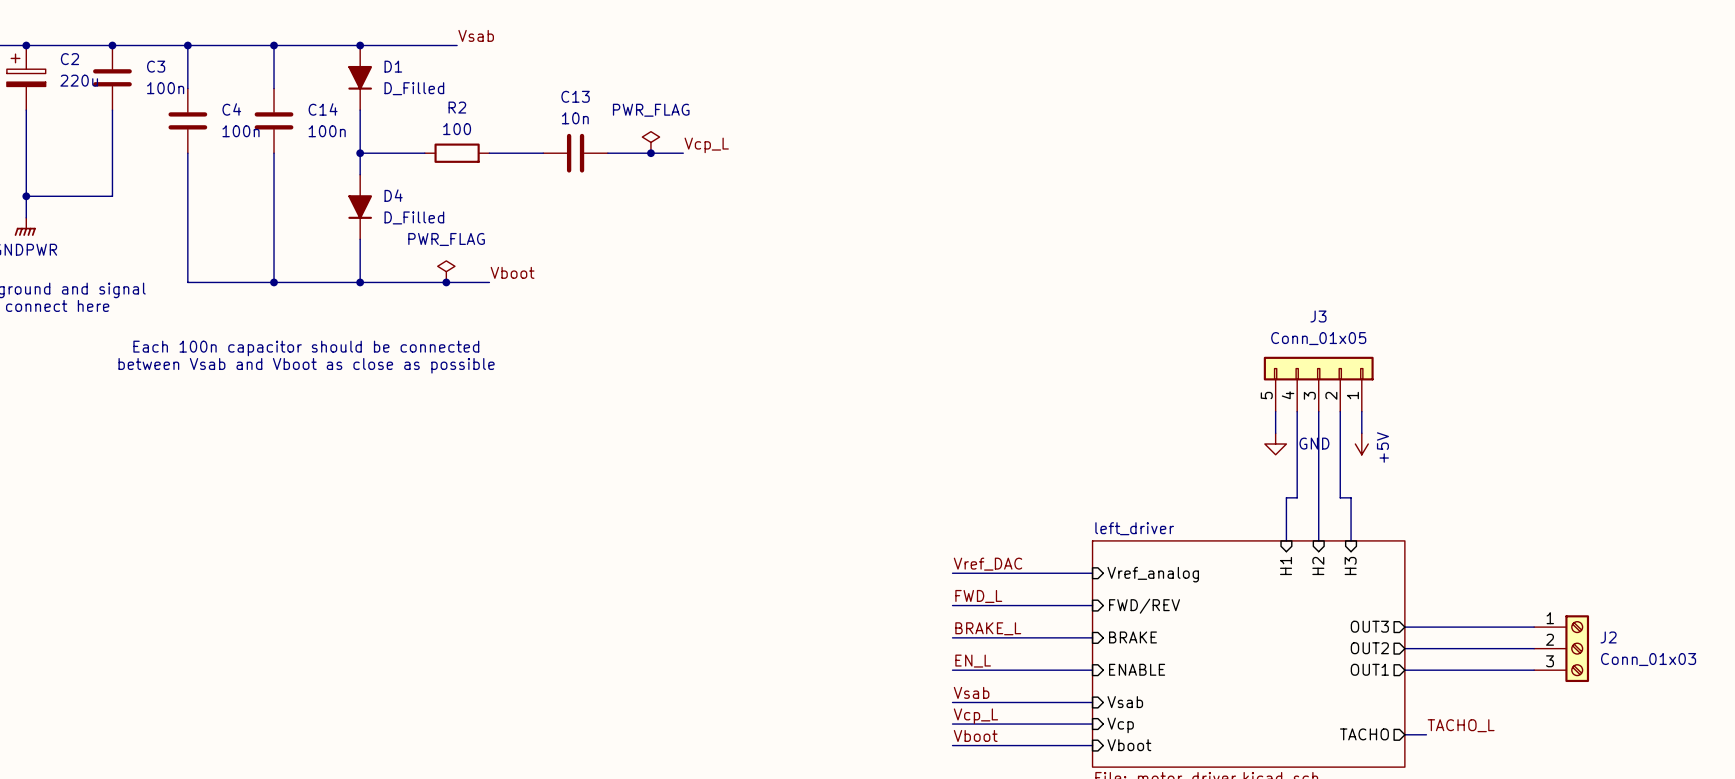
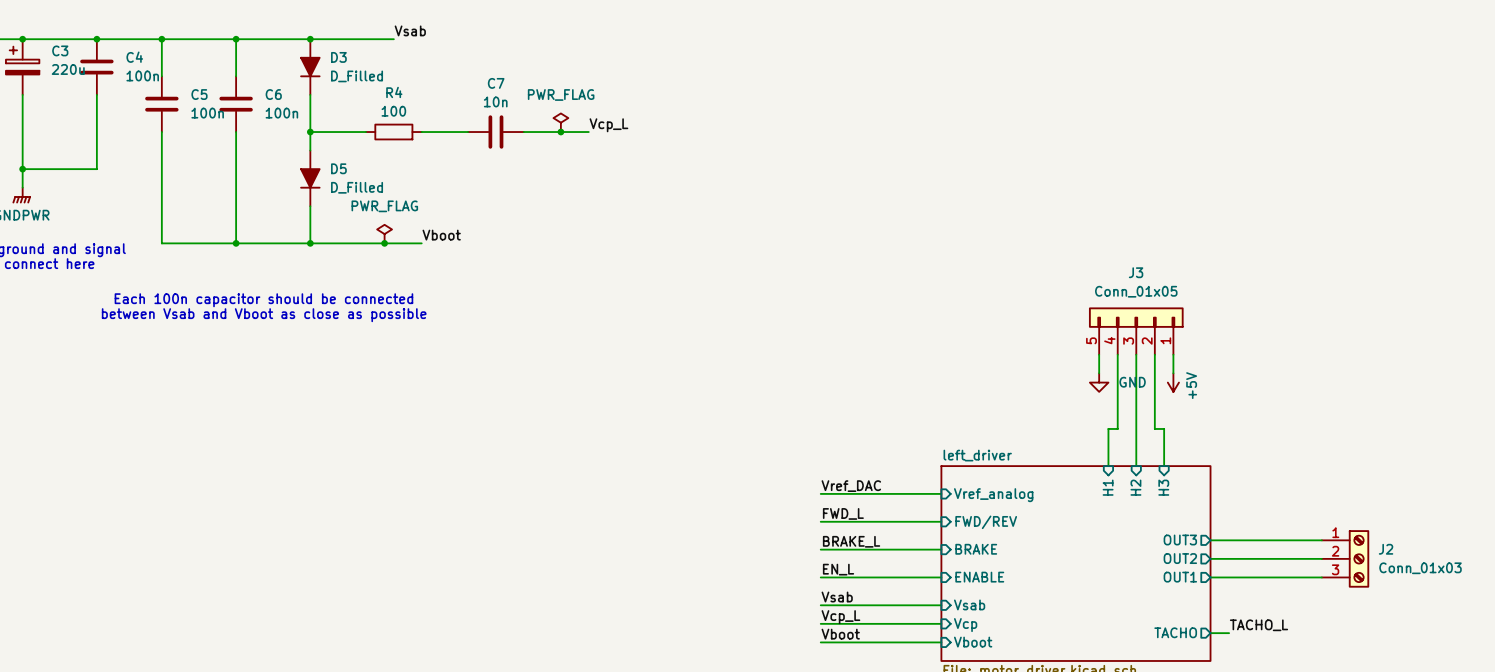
C2 name: C2 (69, 59) -> C3 (60, 50)
C3 name: C3 (156, 66) -> C4 (134, 57)
D1 name: D1 (393, 66) -> D3 (338, 57)
C13 name: C13 (575, 96) -> C7 (496, 83)
R2 name: R2 (457, 107) -> R4 (394, 92)
C4 name: C4 (231, 109) -> C5 (199, 94)
C14 name: C14 (323, 109) -> C6 (273, 94)
D4 name: D4 (393, 195) -> D5 (338, 168)

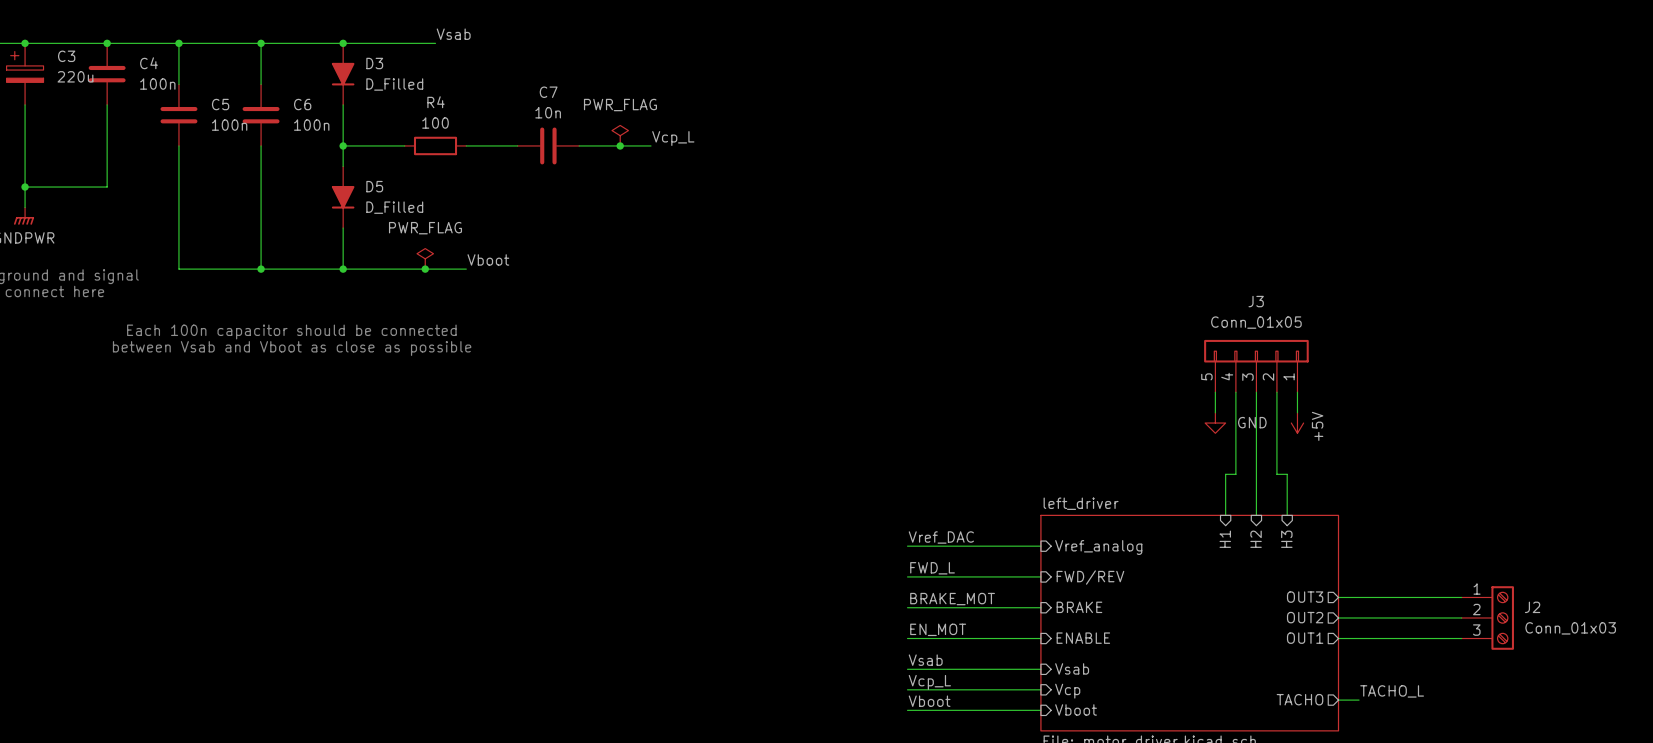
label: BRAKE_L (851, 541) -> BRAKE_MOT (952, 599)
label: EN_L (838, 569) -> EN_MOT (938, 629)

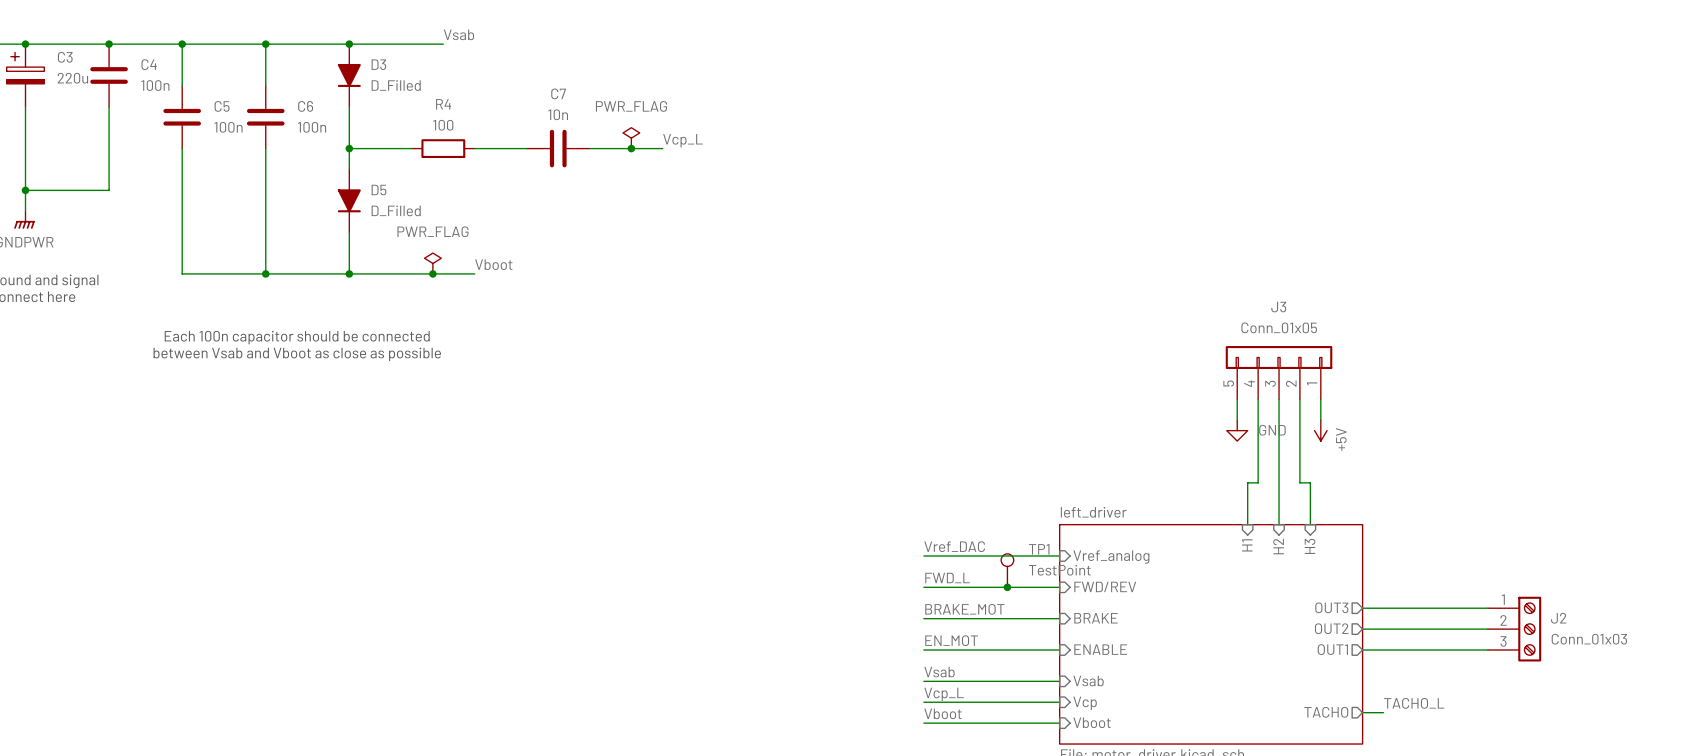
TP1: none -> TestPoint (1007, 570)
junction: none -> (1007, 587)

